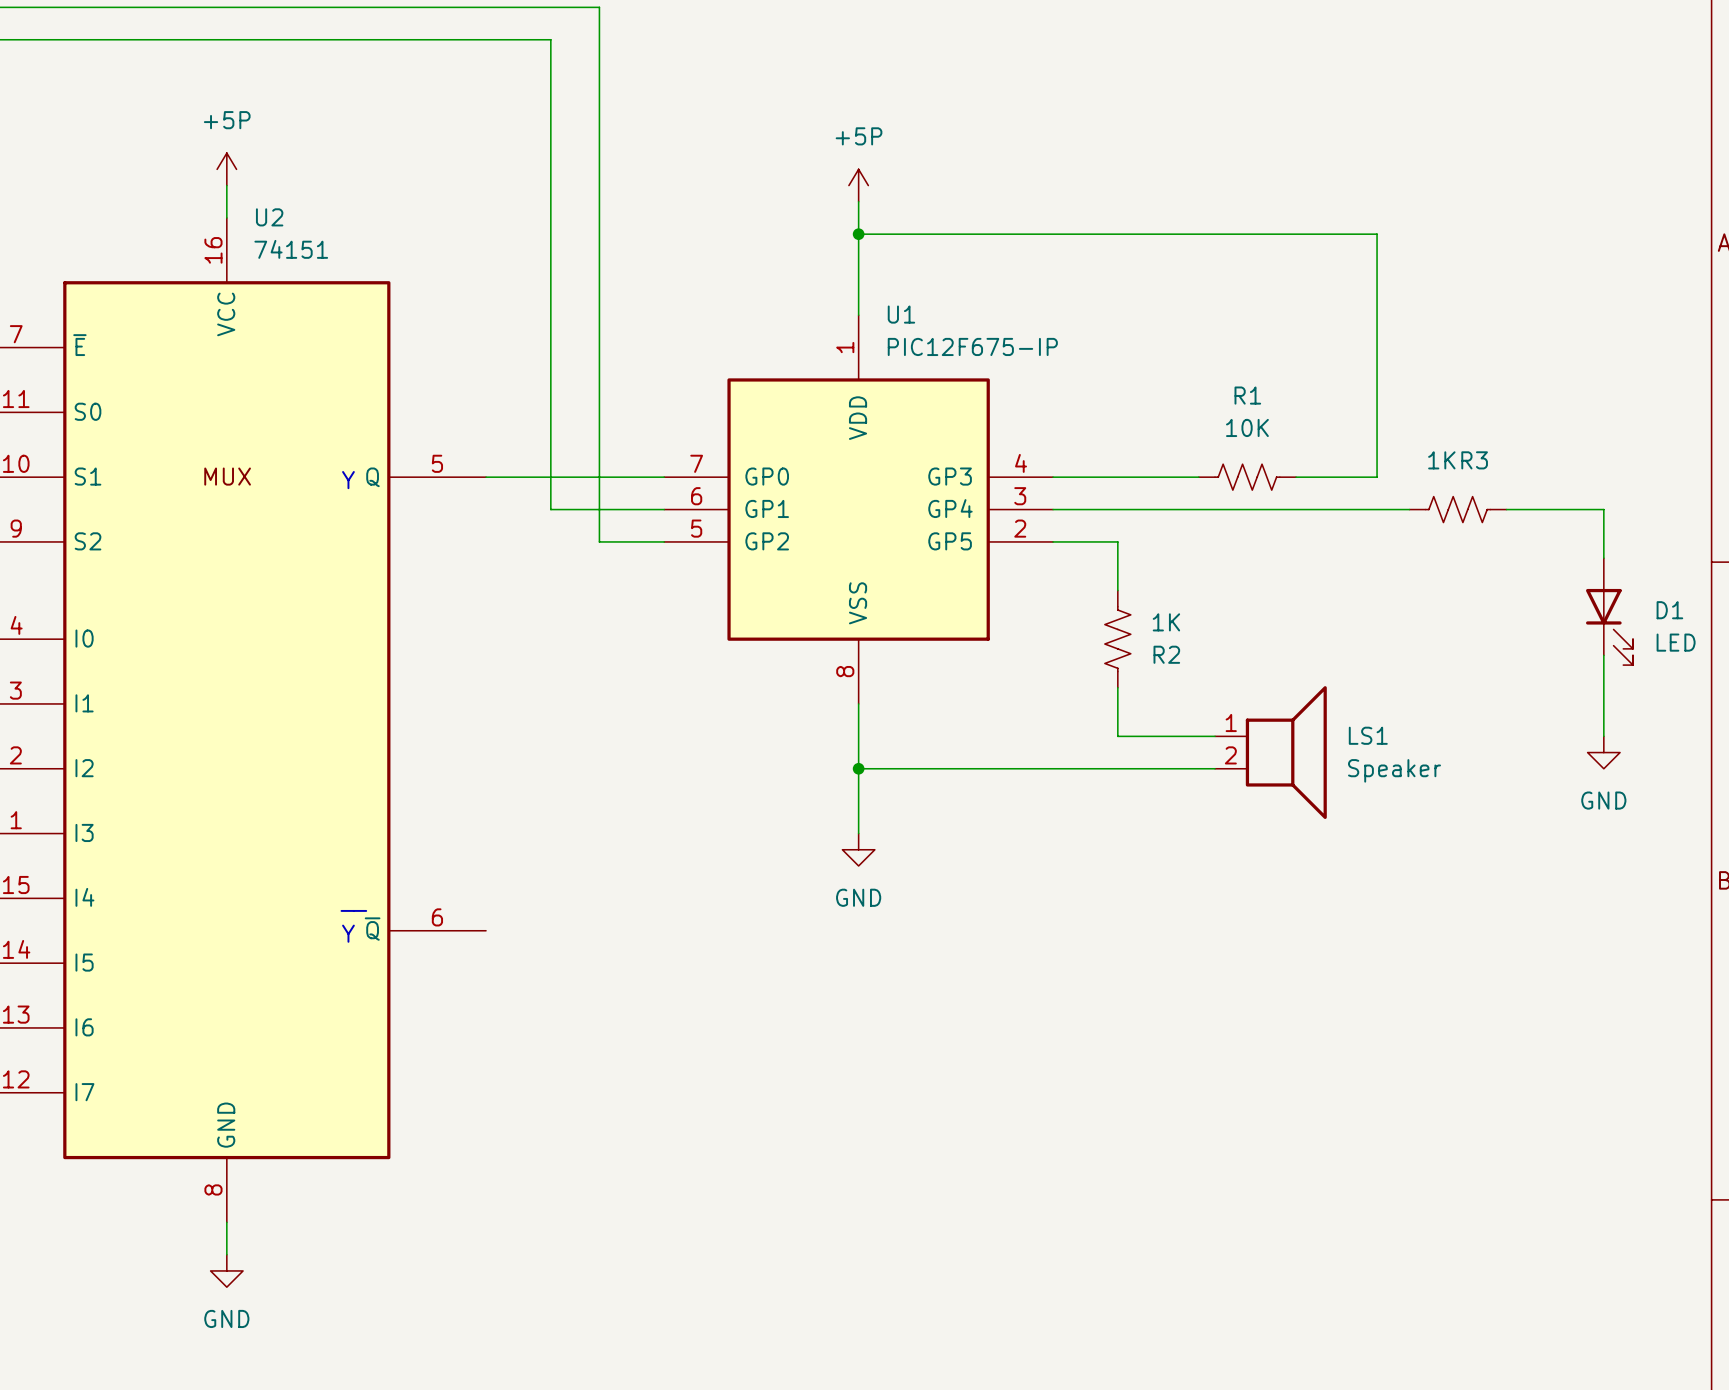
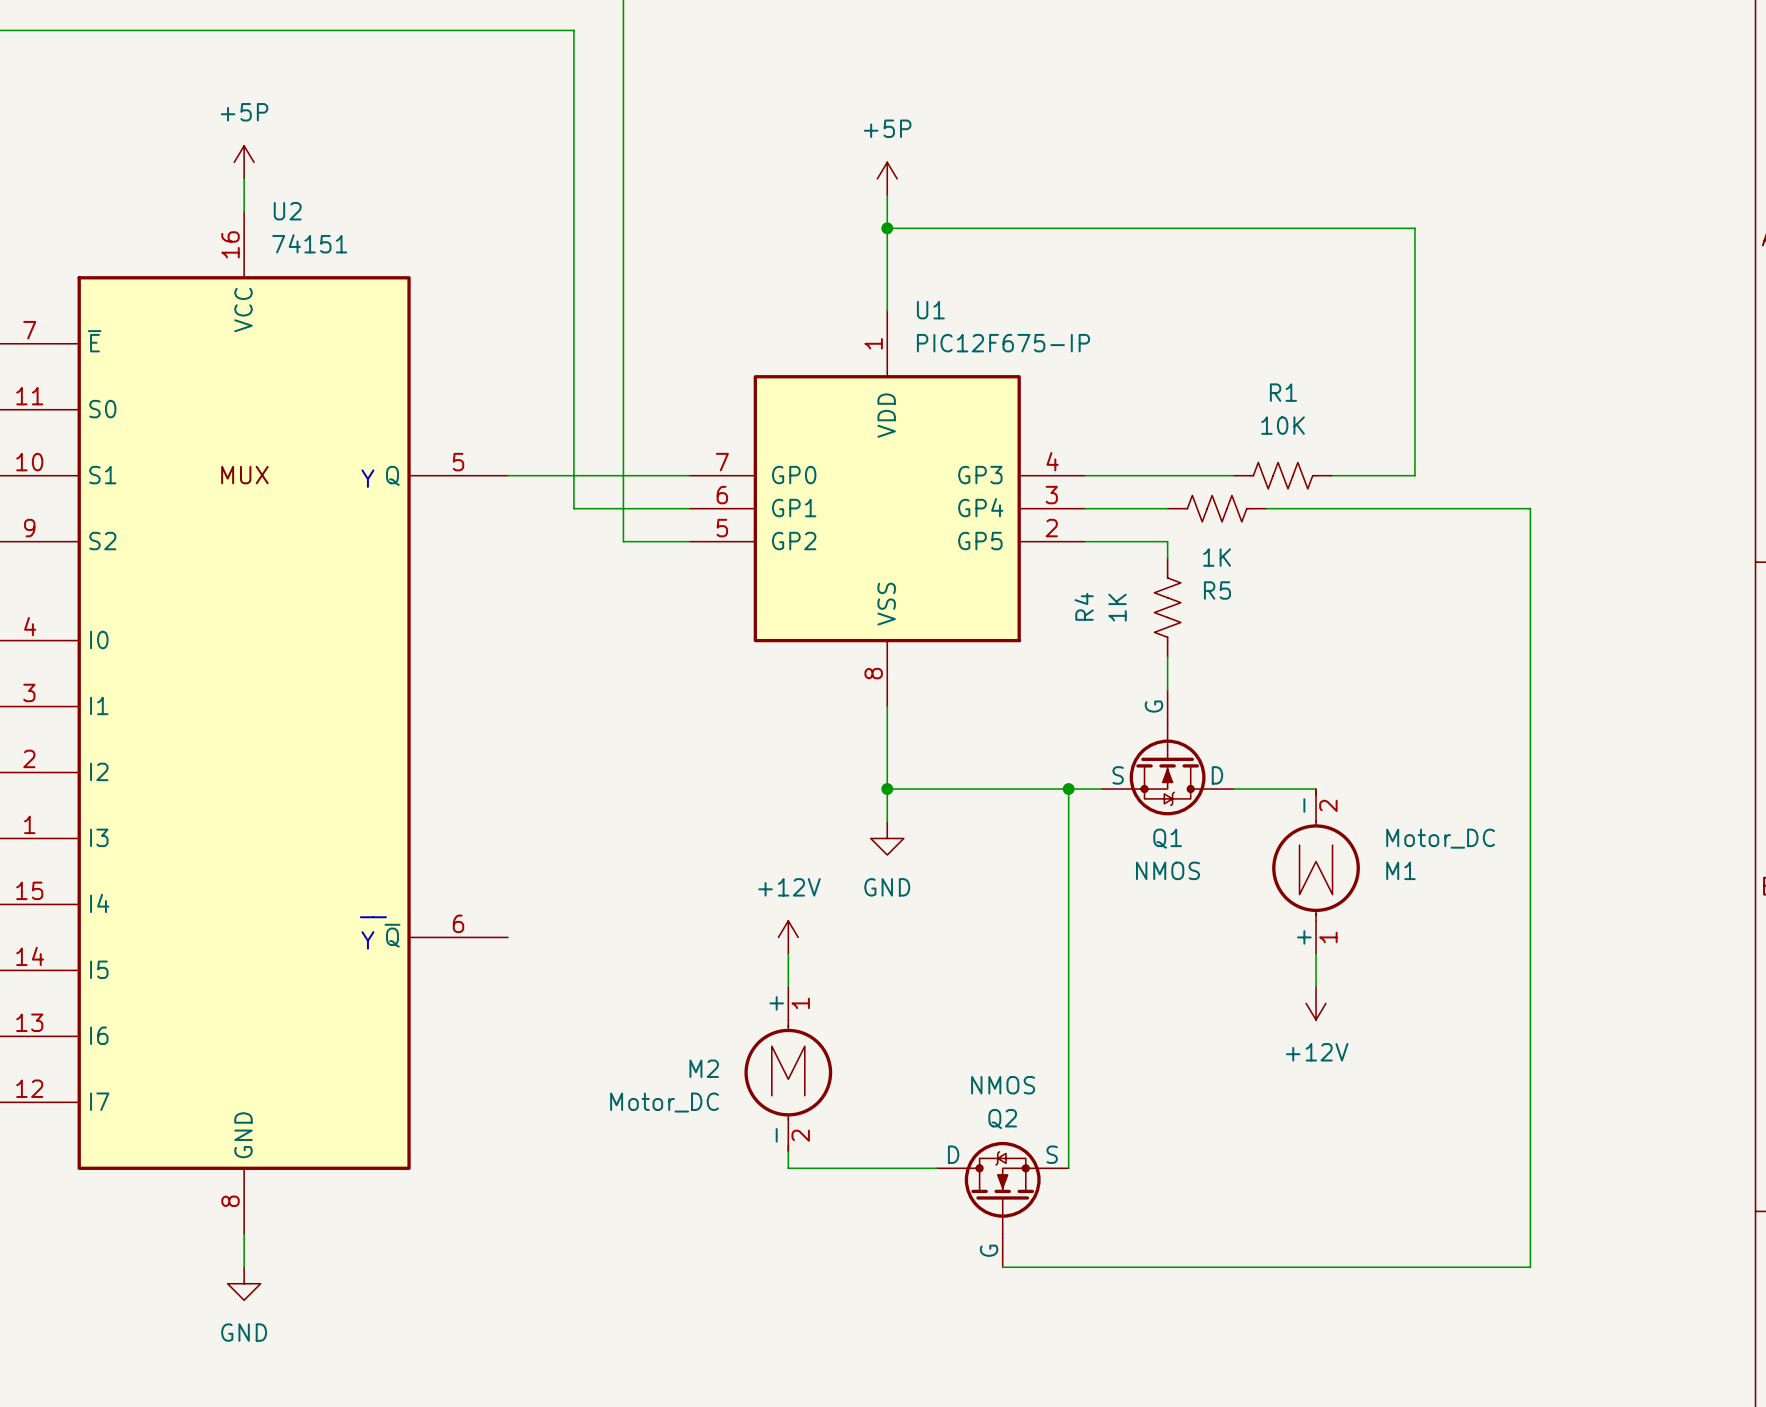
R5: none -> 1K (1217, 508)
wire: none -> (1447, 508) (1530, 508) (1530, 1267) (1002, 1267)
R3: 1K (1458, 509) -> none
wire: (1506, 509) (1603, 509) (1603, 558) -> none
wire: (1117, 541) (1117, 590) -> (1151, 541) (1167, 541) (1167, 558)
R4: none -> 1K (1167, 607)
D1: LED (1609, 611) -> none
R2: 1K (1117, 639) -> none
wire: none -> (1167, 657) (1167, 690)
wire: (1603, 655) (1603, 736) -> none
wire: (1117, 687) (1117, 736) (1215, 736) -> none
Q1: none -> NMOS (1167, 752)
LS1: Speaker (1270, 752) -> none
power symbol: GND (1603, 752) -> none
wire: (858, 768) (1215, 768) -> none
junction position: (858, 768) -> (887, 789)
wire: none -> (887, 789) (1101, 789)
wire: none -> (1068, 789) (1068, 1168)
junction: none -> (1068, 789)
wire: none -> (1233, 789) (1316, 789)
power symbol position: GND (858, 849) -> GND (887, 838)
M1: none -> Motor_DC (1316, 871)
power symbol: none -> +12V (788, 937)
wire: none -> (788, 953) (788, 986)
wire: none -> (1316, 953) (1316, 986)
power symbol: none -> +12V (1316, 1003)
M2: none -> Motor_DC (788, 1069)
wire: none -> (788, 1151) (788, 1168) (936, 1168)
Q2: none -> NMOS (1002, 1204)

